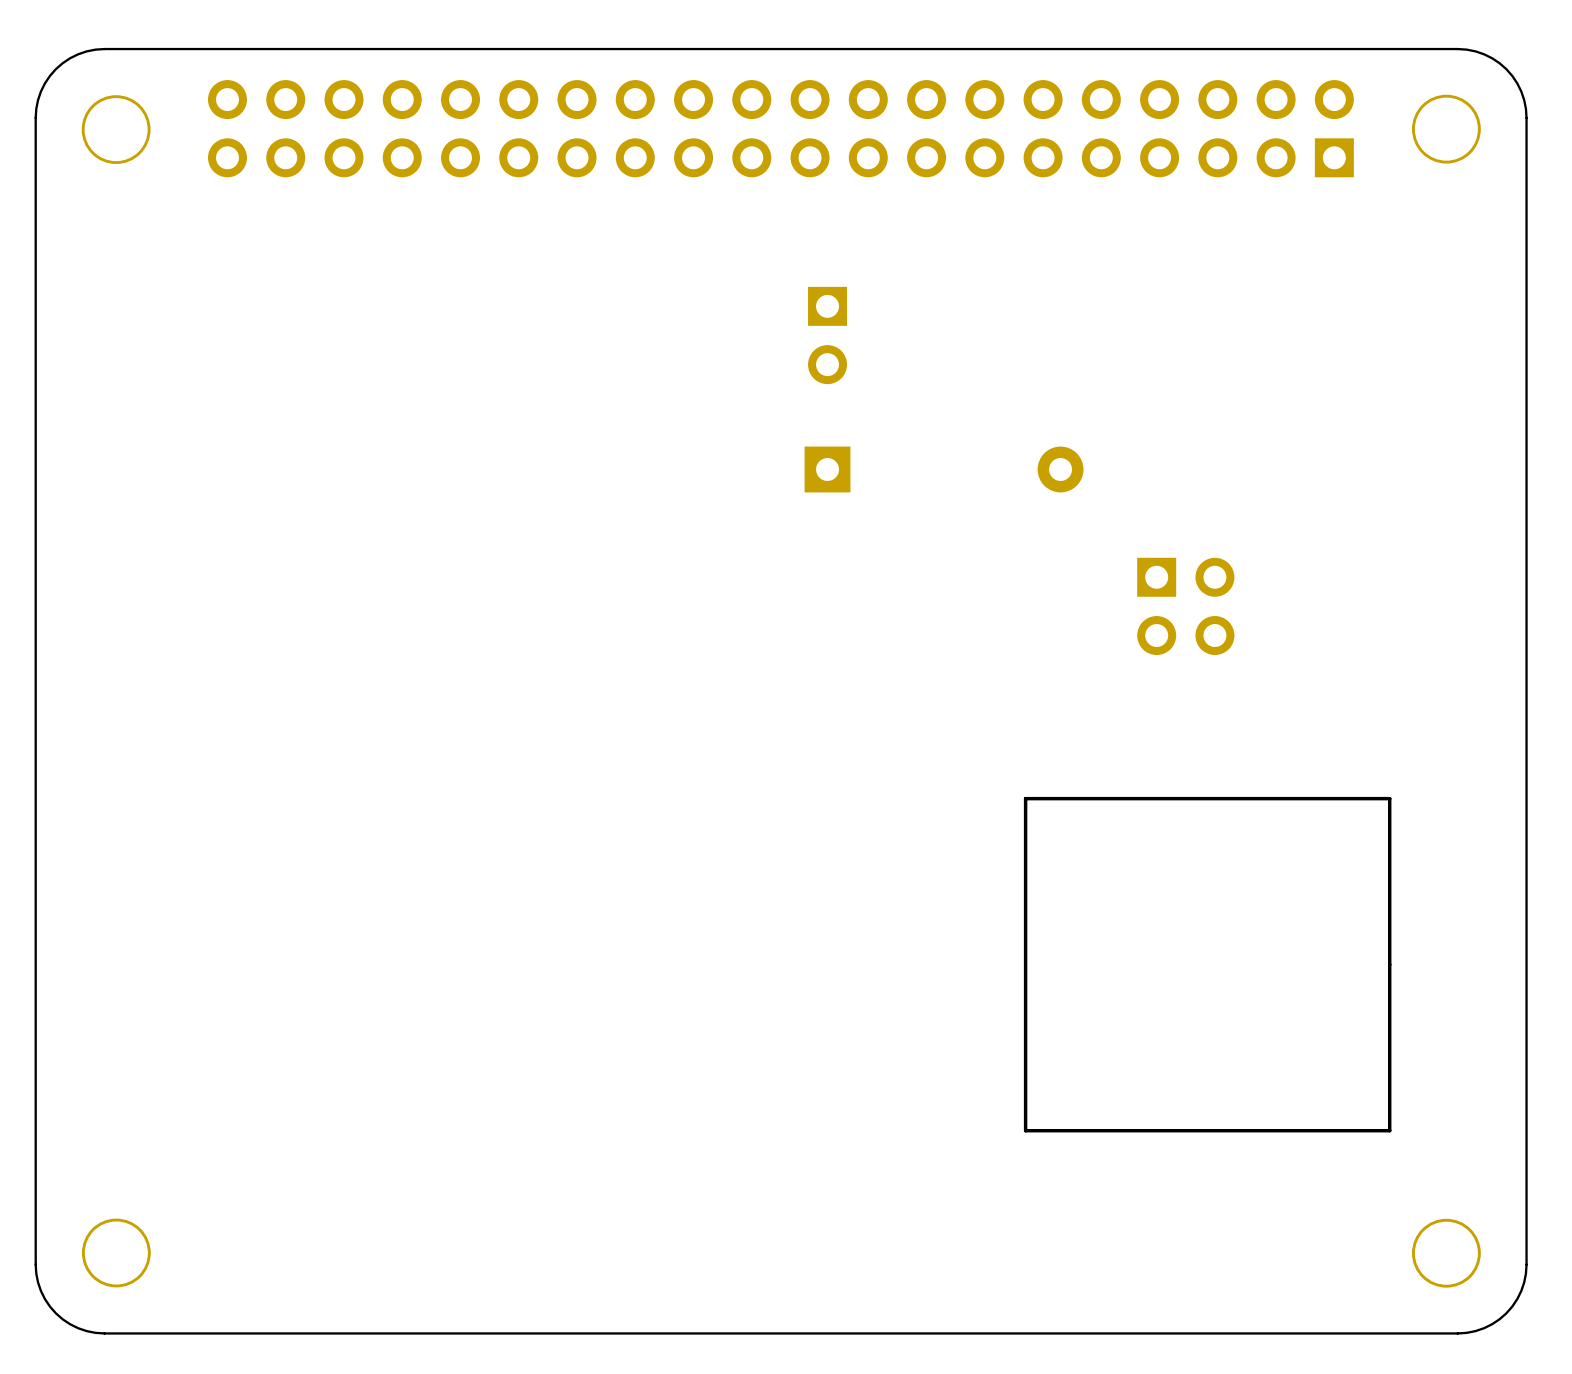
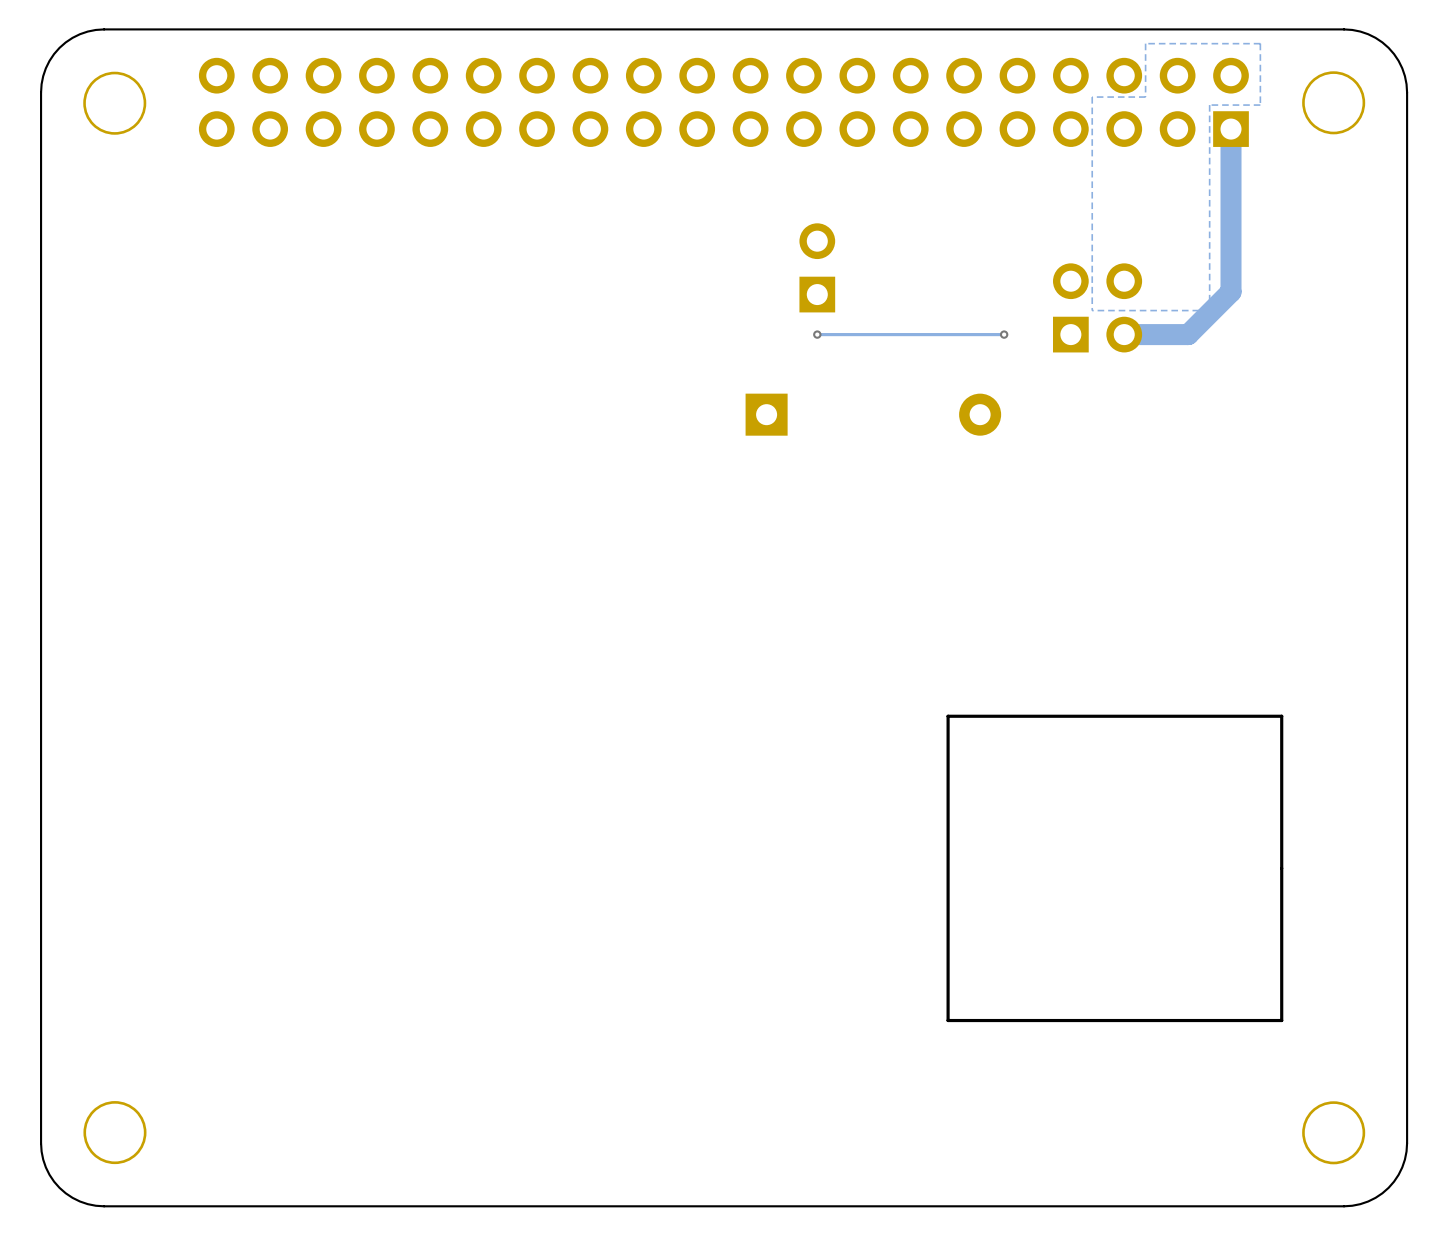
zone outline: none -> (1260, 43) (1260, 105) (1209, 105) (1209, 310) (1092, 310) (1092, 97) (1145, 97) (1145, 43) (1260, 43)
track: none -> (1231, 129) (1231, 291) (1188, 334) (1124, 334)
part rotation: 0° (827, 335) -> 180° (817, 267)
part position: (827, 335) -> (817, 267)
via: none -> (817, 334)
track: none -> (1004, 334) (817, 334)
via: none -> (1004, 334)
part rotation: 0° (1185, 606) -> 90° counterclockwise (1097, 307)
part position: (1185, 606) -> (1097, 307)

